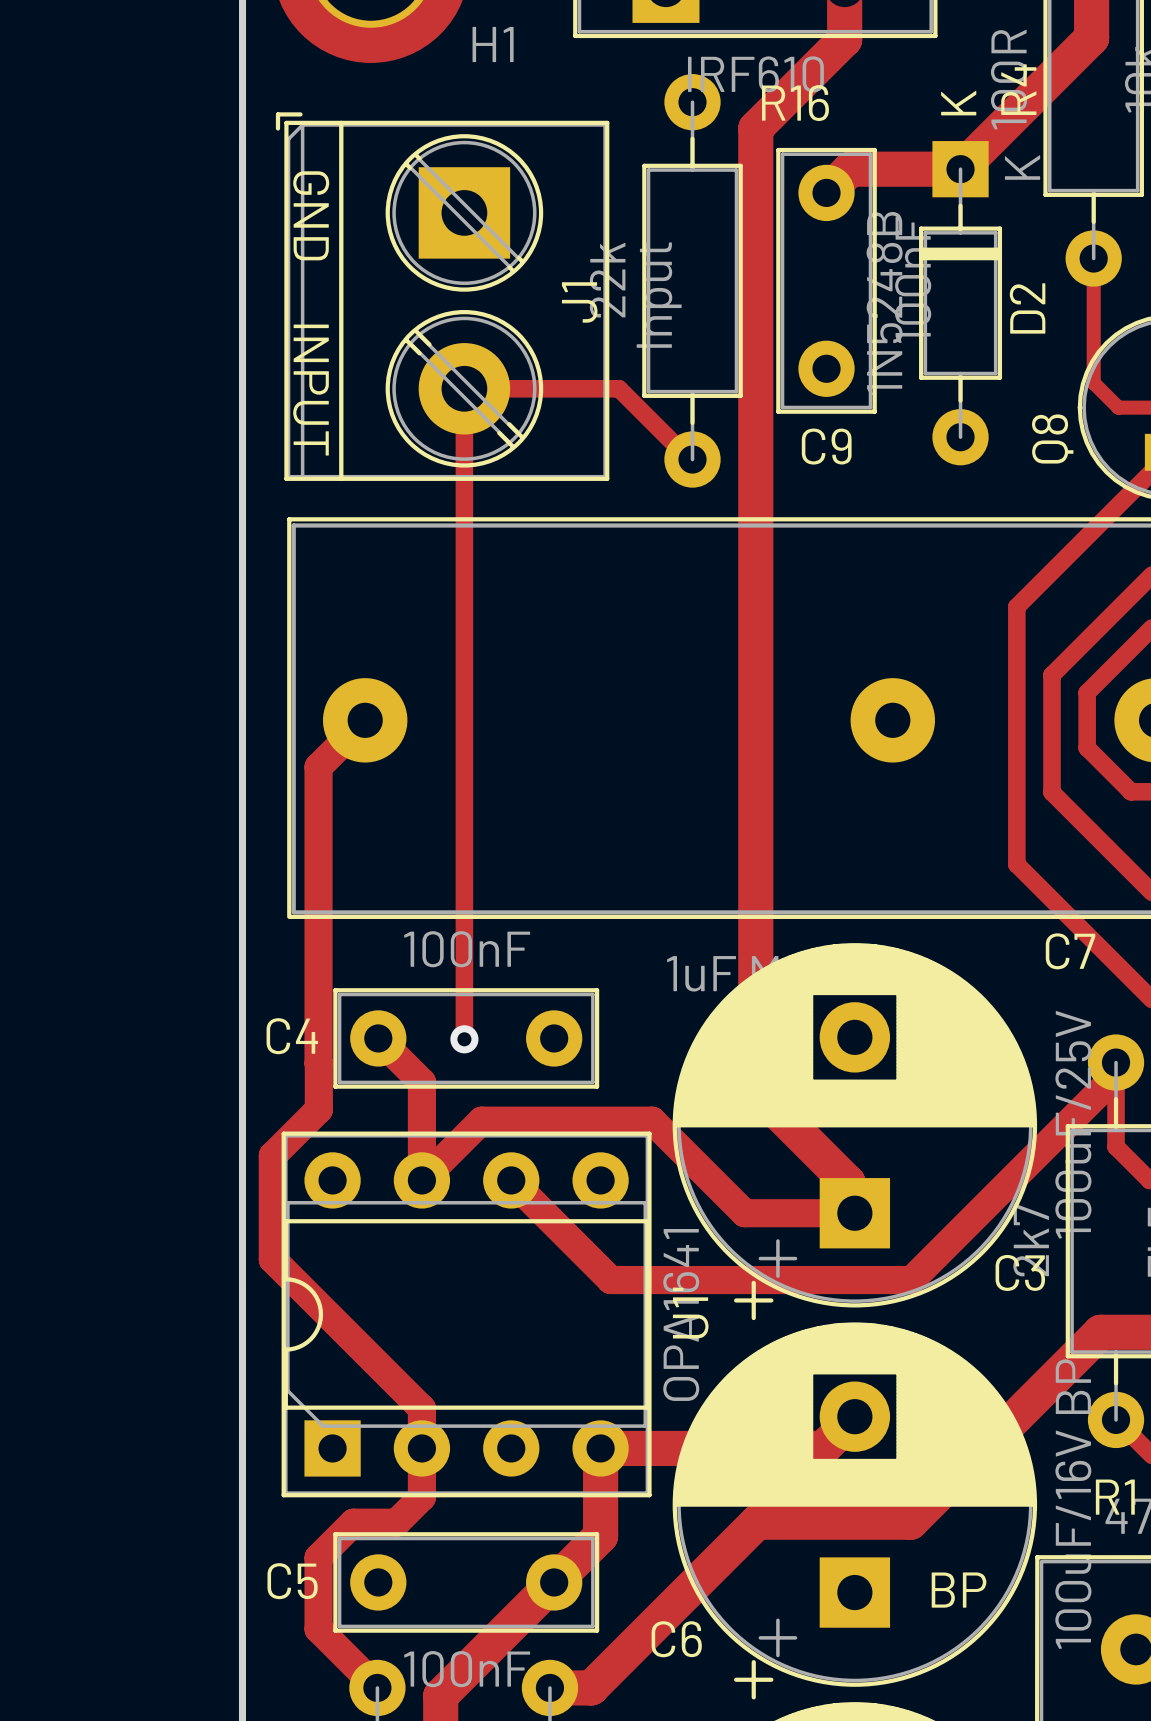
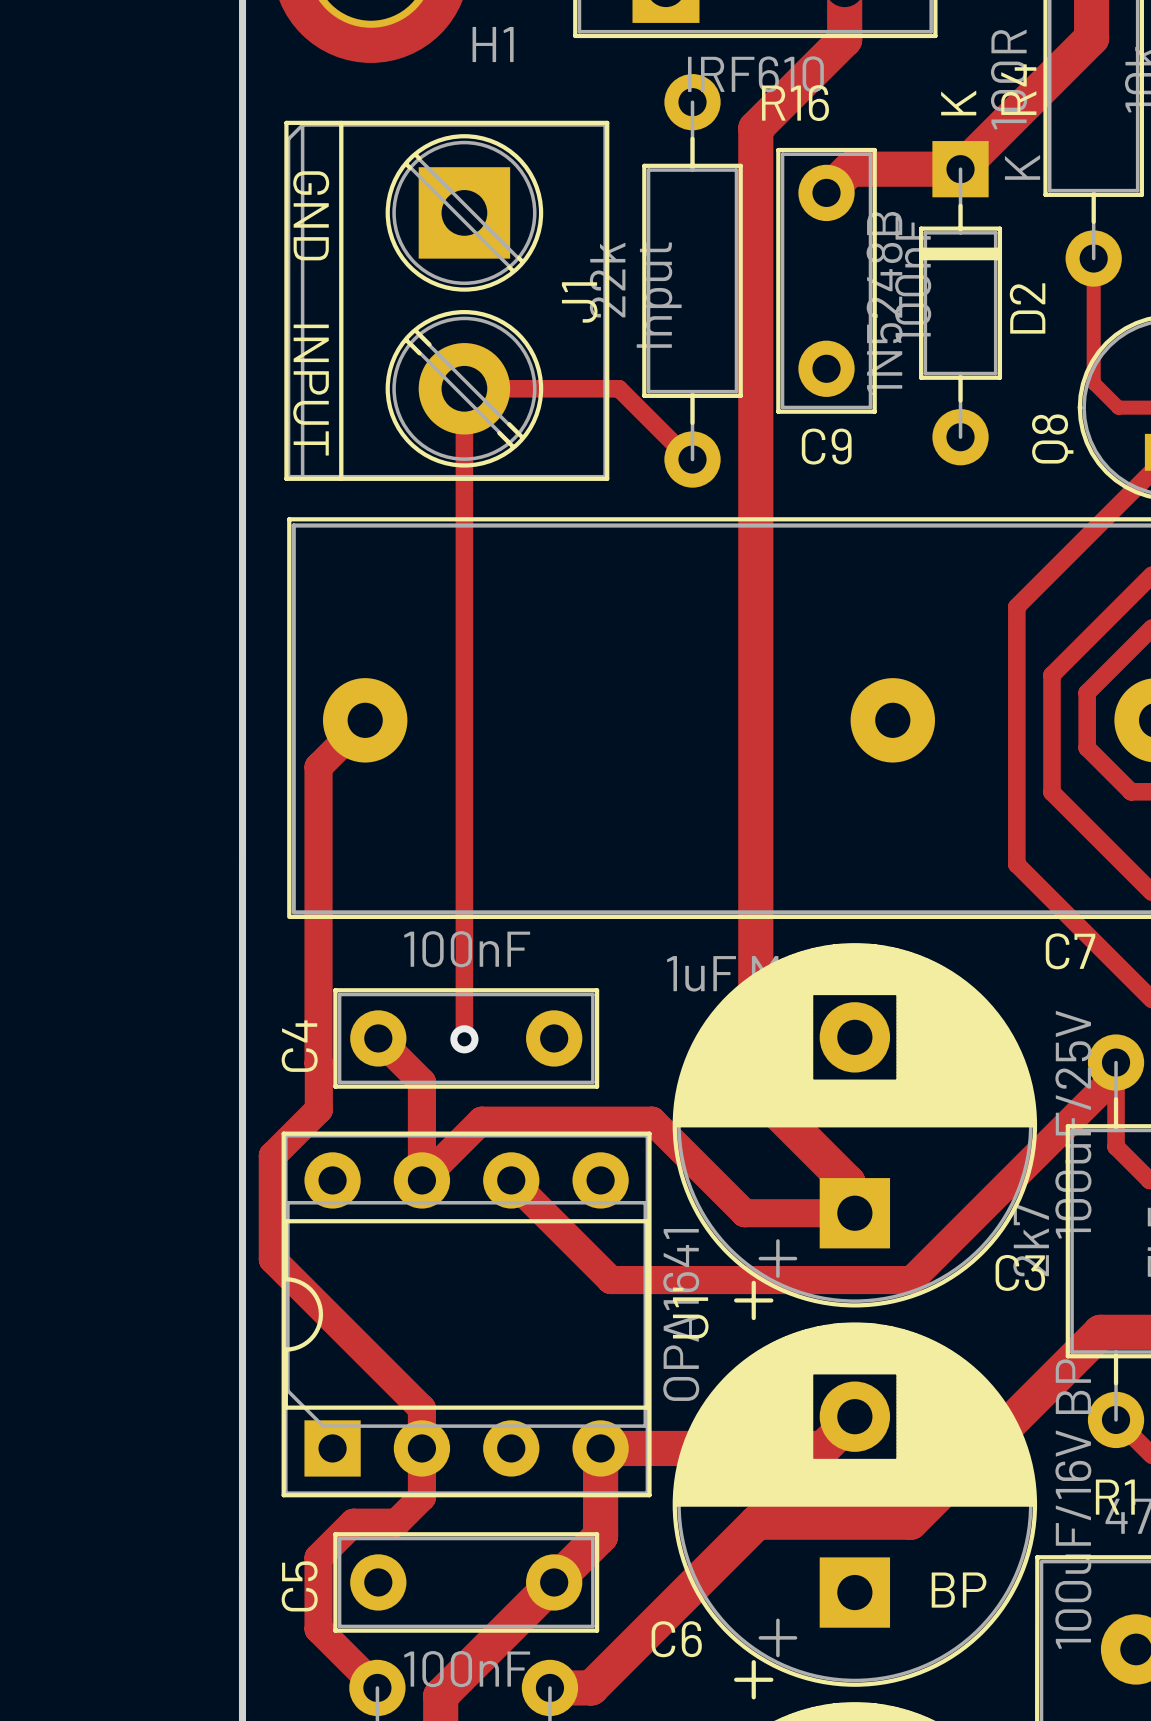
J1 footprint: [275, 112, 610, 481] -> [284, 120, 610, 481]
C4 name rotation: 0° (292, 1036) -> 90° counterclockwise (299, 1046)
C5 name rotation: 0° (292, 1581) -> 90° counterclockwise (299, 1586)

